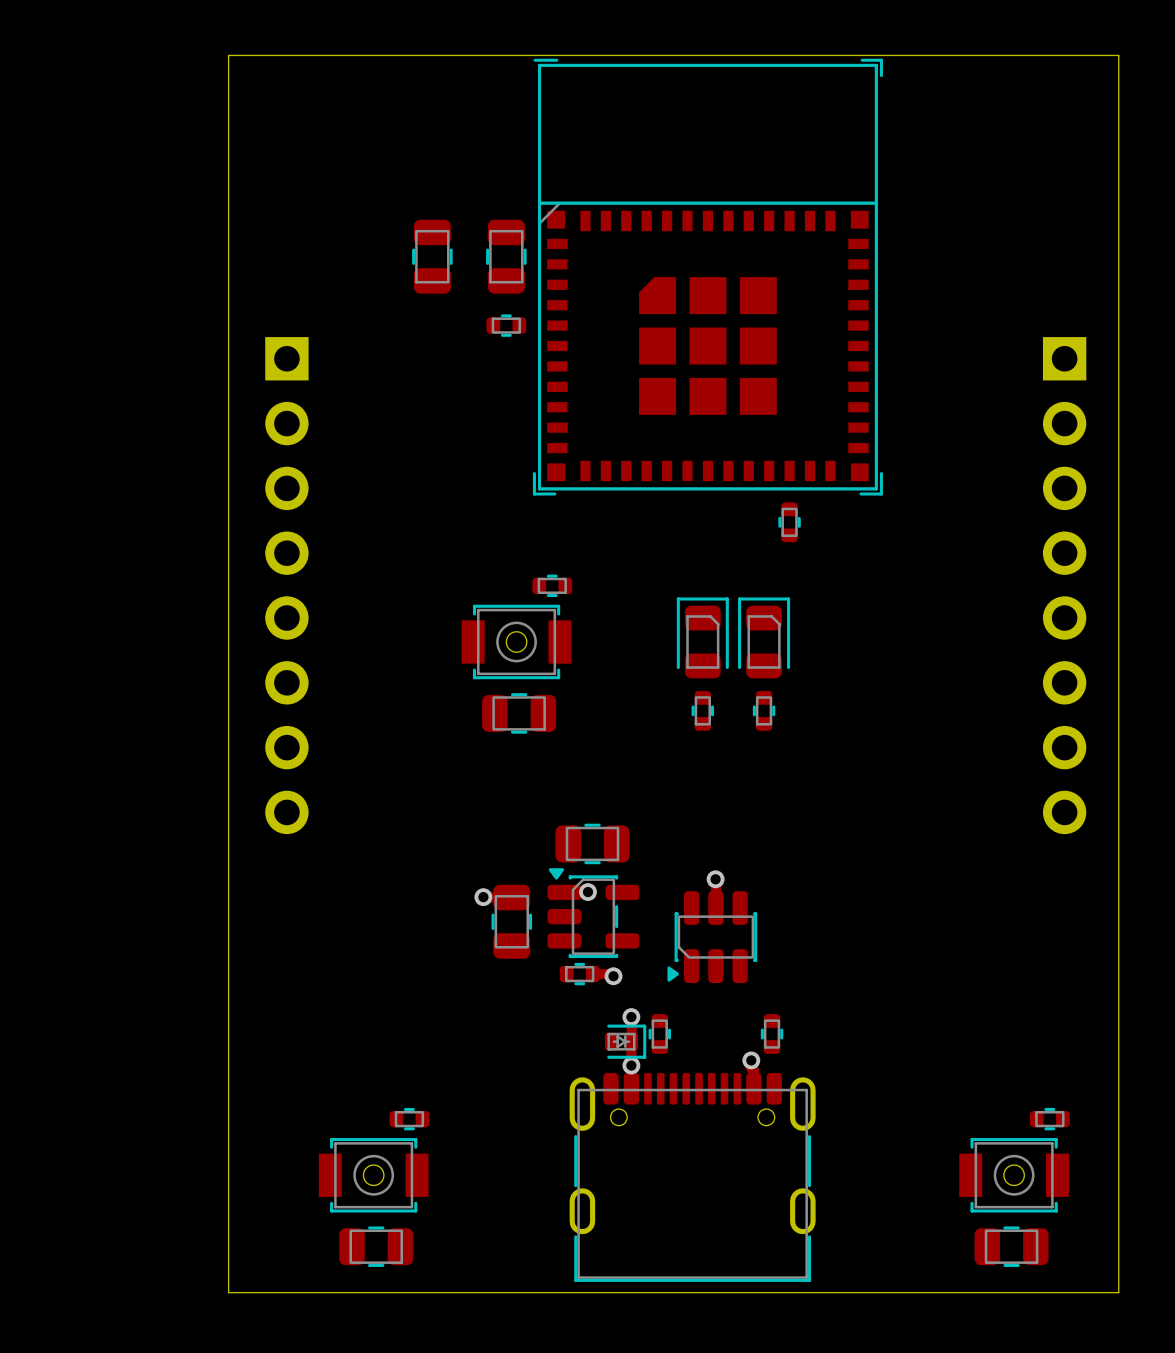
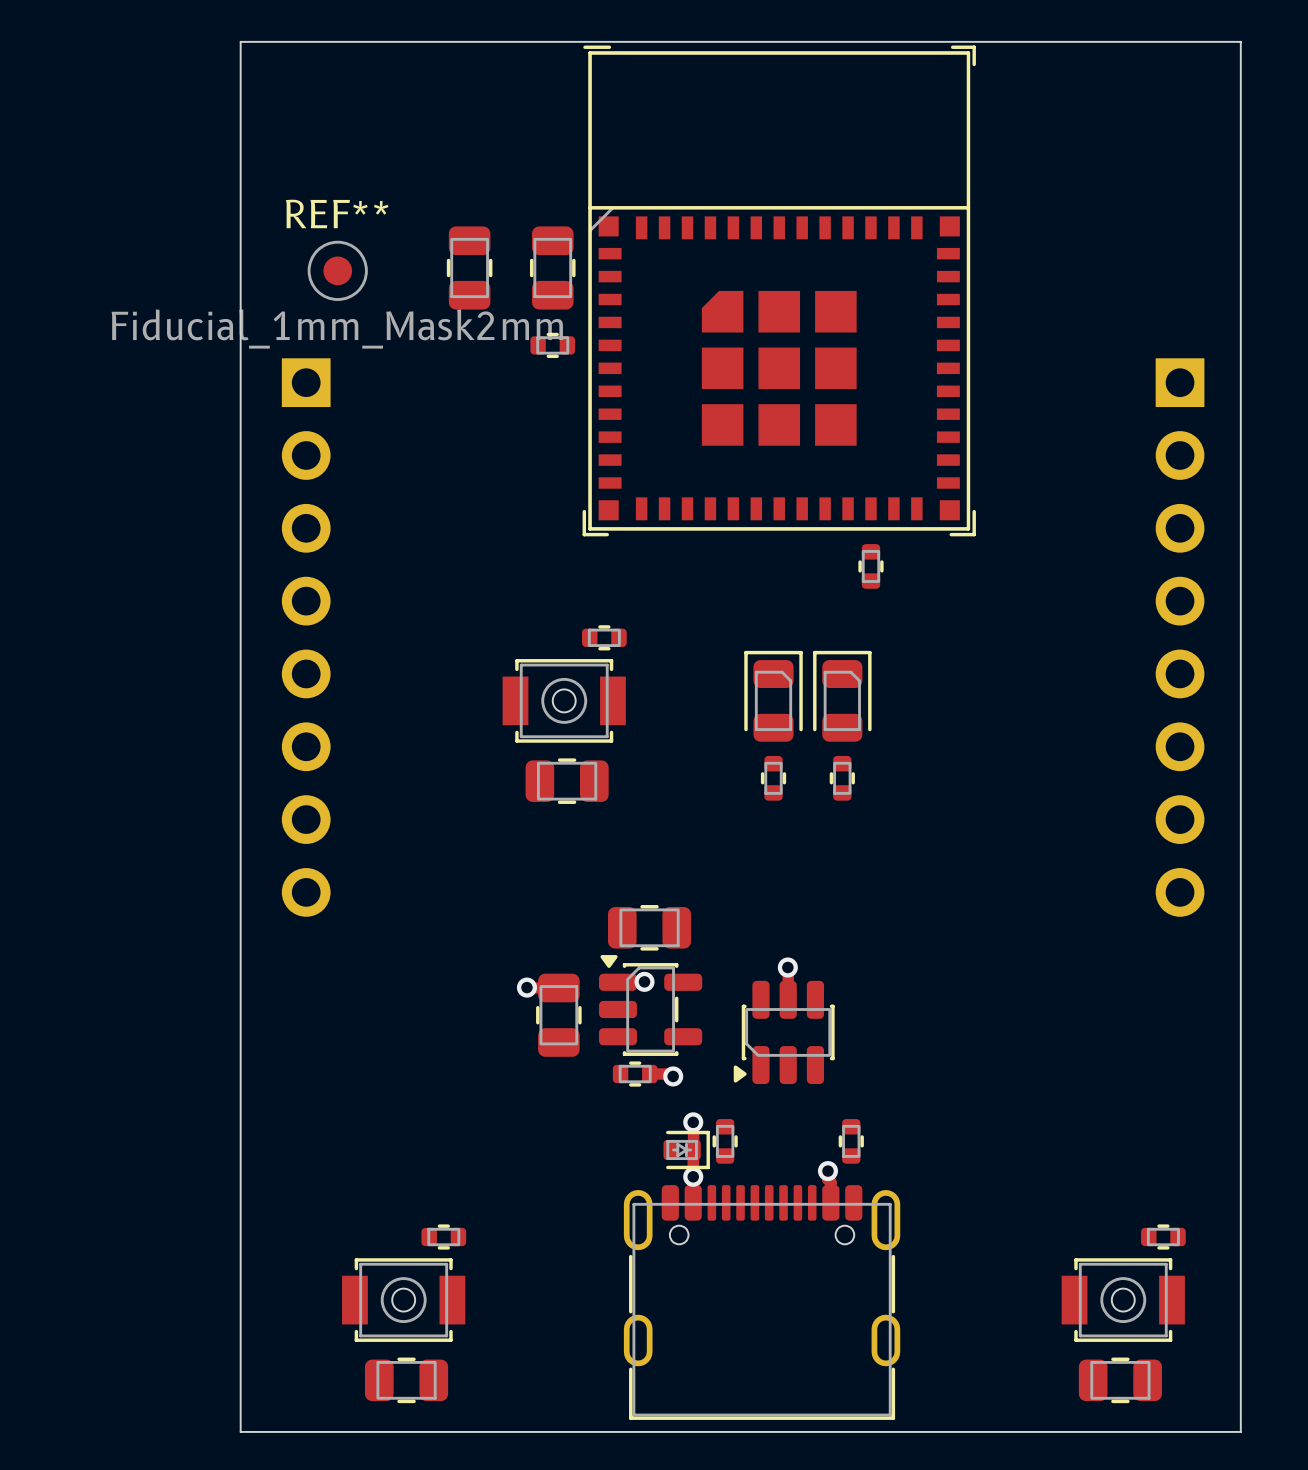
REF**: none -> Fiducial_1mm_Mask2mm (337, 270)

